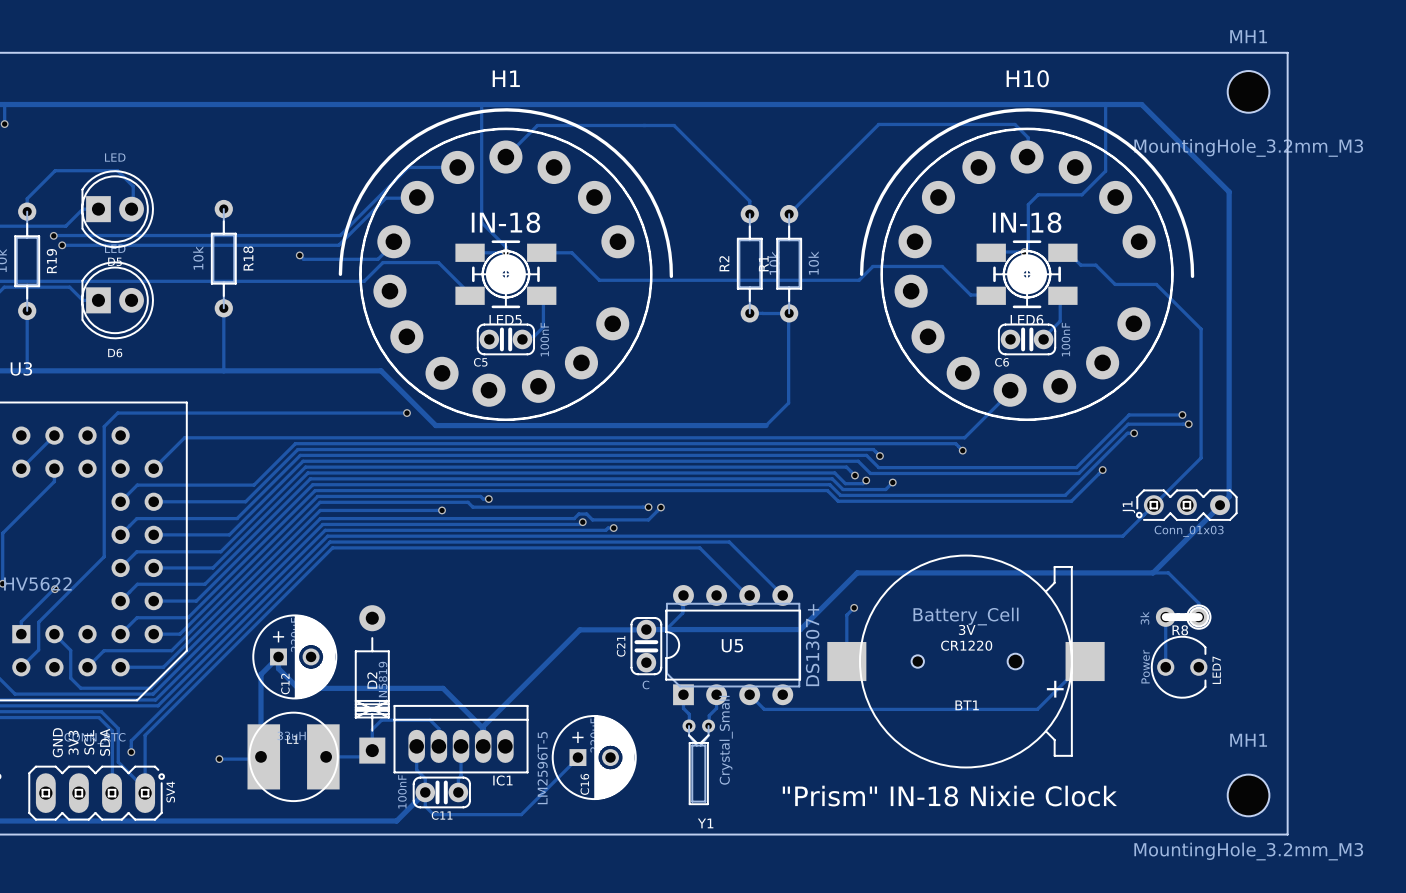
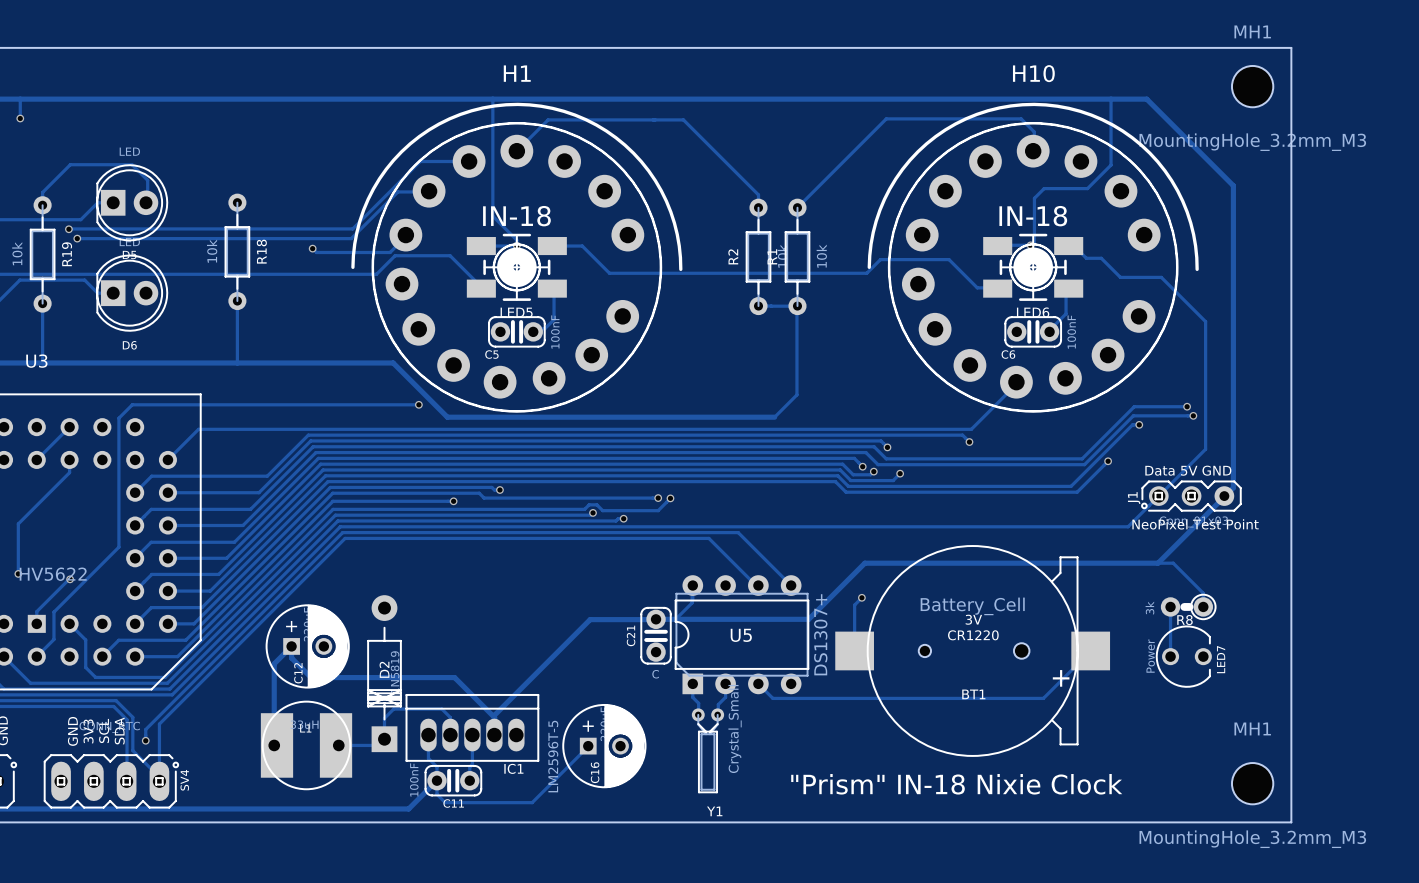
text: none -> Data 5V GND (1188, 470)
text: none -> NeoPixel Test Point (1195, 524)
R8 footprint: [1155, 604, 1211, 630] -> [1160, 594, 1217, 620]
track: (219, 759) (262, 759) -> none
via: (219, 759) -> none

